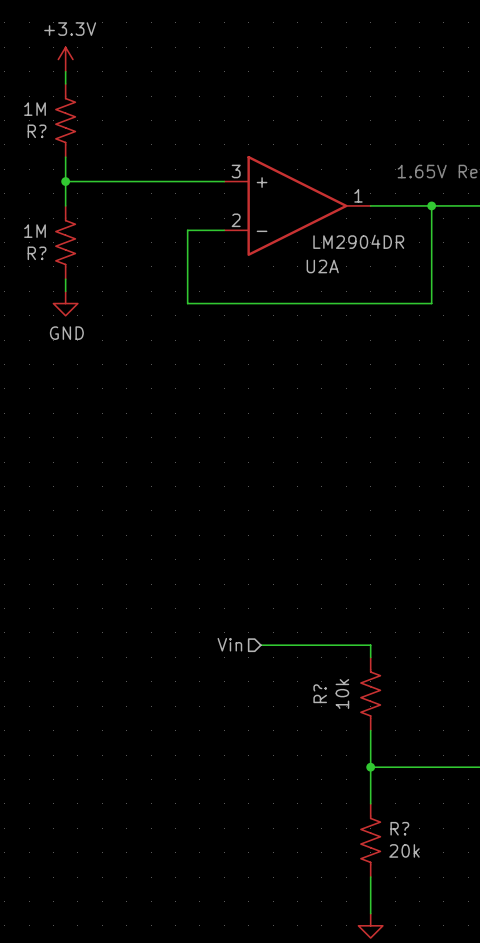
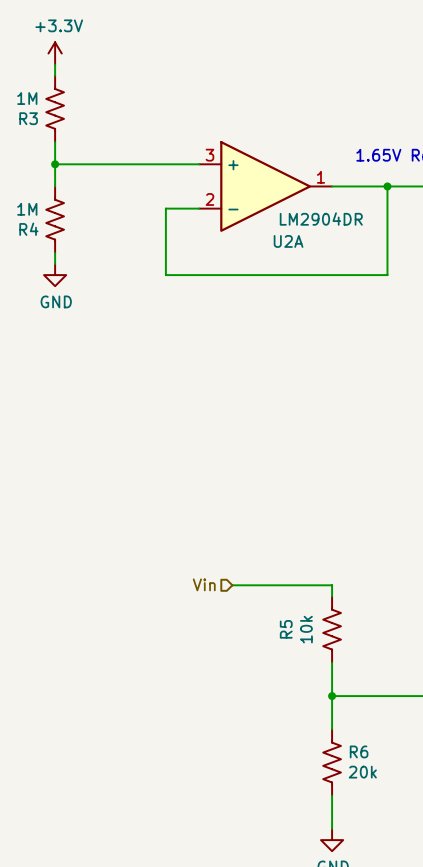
R? name: R? (37, 131) -> R3 (28, 118)
R? name: R? (37, 253) -> R4 (28, 229)
R? name: R? (320, 693) -> R5 (286, 629)
R? name: R? (399, 828) -> R6 (359, 751)

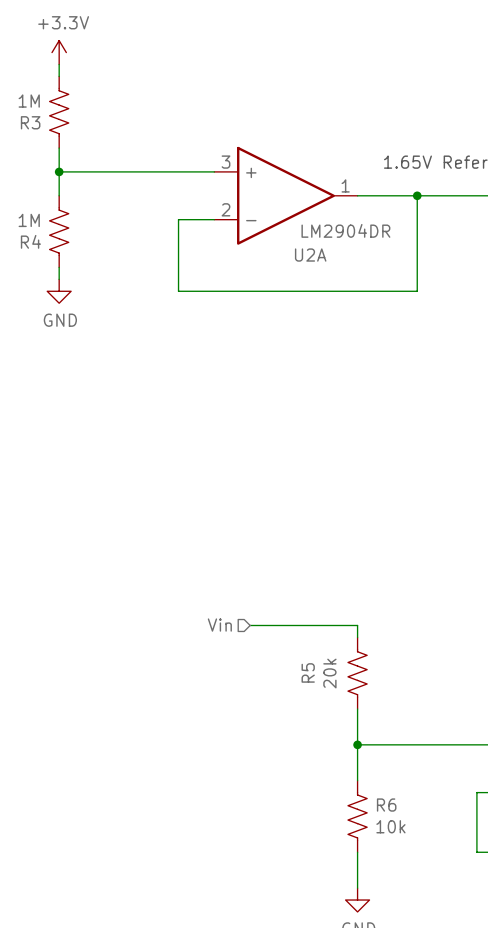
R5 value: 10k (306, 629) -> 20k (329, 673)
R6 value: 20k (362, 772) -> 10k (390, 826)

